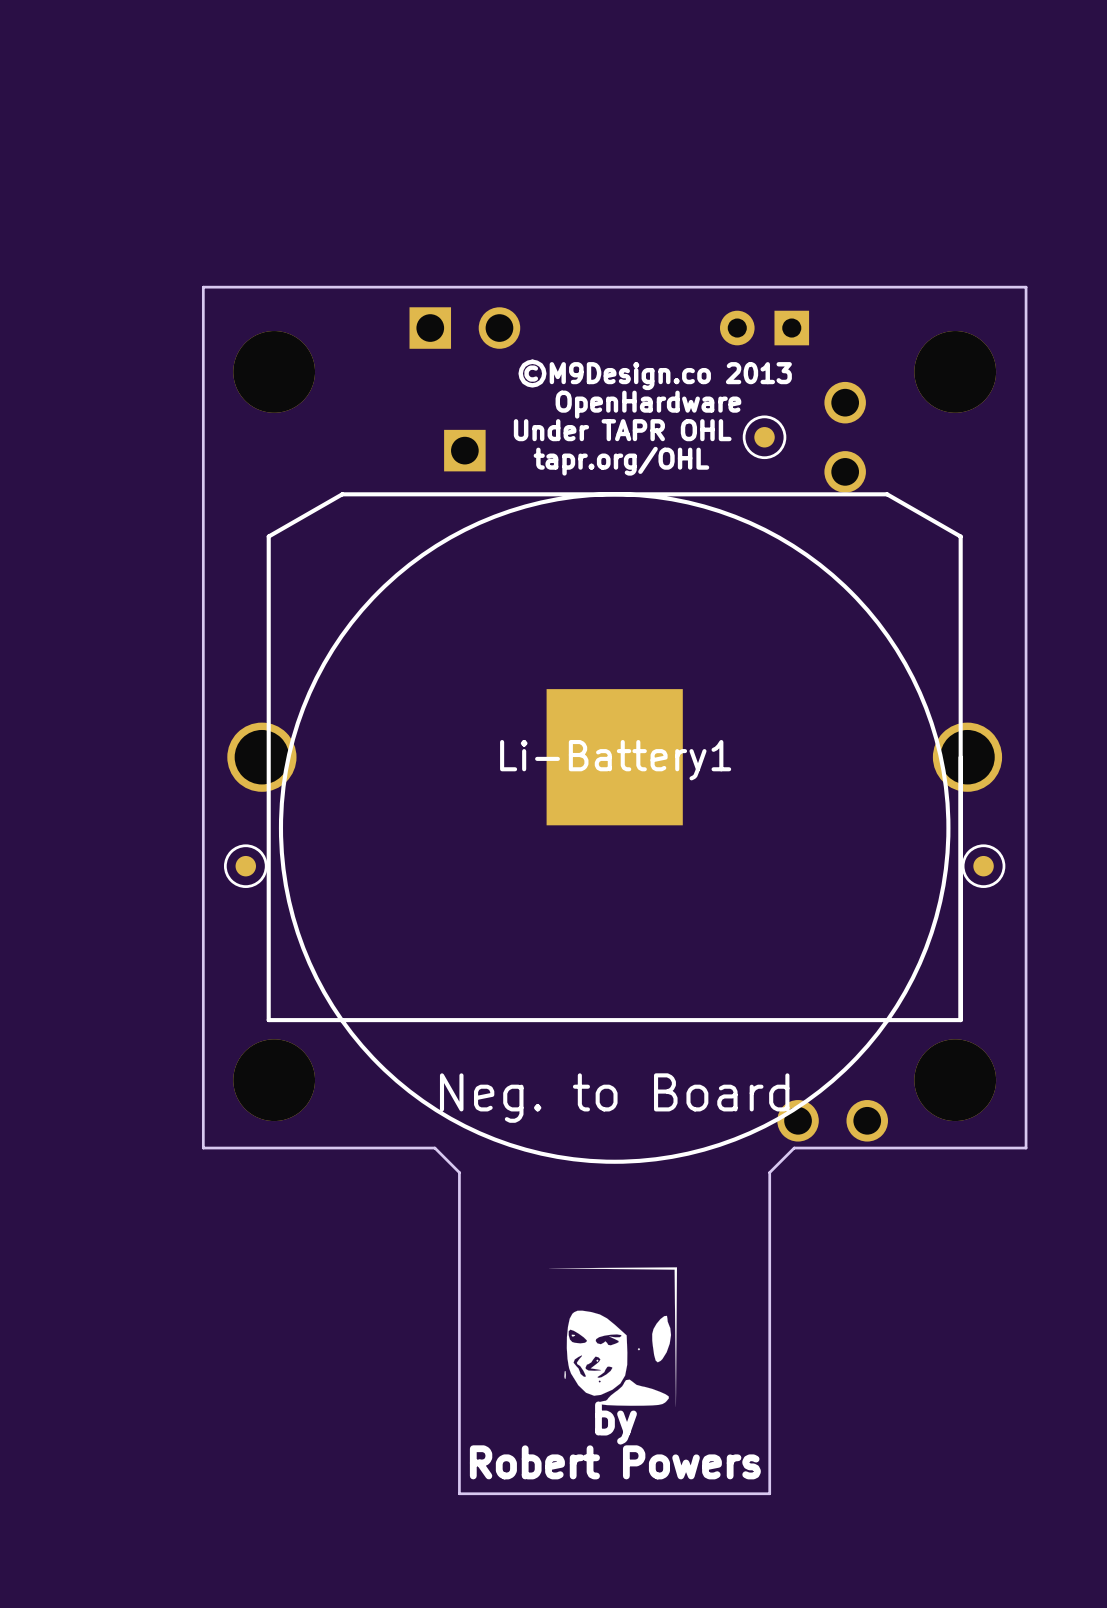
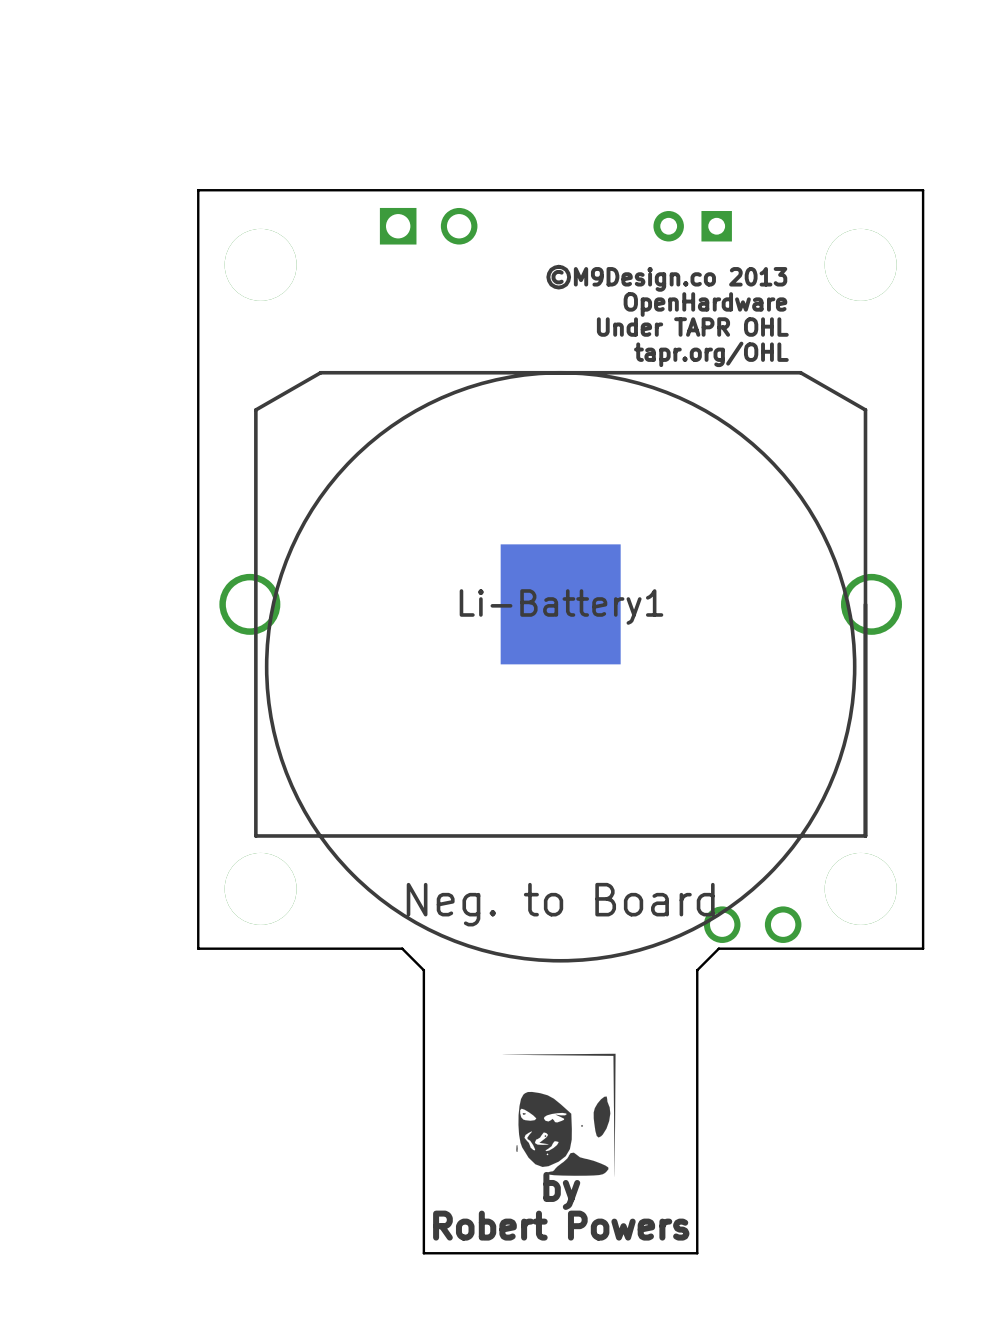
text position: ©M9Design.co 2013 (655, 374) -> ©M9Design.co 2013 (666, 278)
text position: OpenHardware (648, 404) -> OpenHardware (705, 304)
text position: Under TAPR OHL (622, 430) -> Under TAPR OHL (692, 327)
part: (764, 437) -> none
part: (845, 437) -> none
part: (464, 450) -> none
text position: tapr.org/OHL (621, 461) -> tapr.org/OHL (711, 354)
part: (245, 866) -> none
part: (983, 866) -> none

